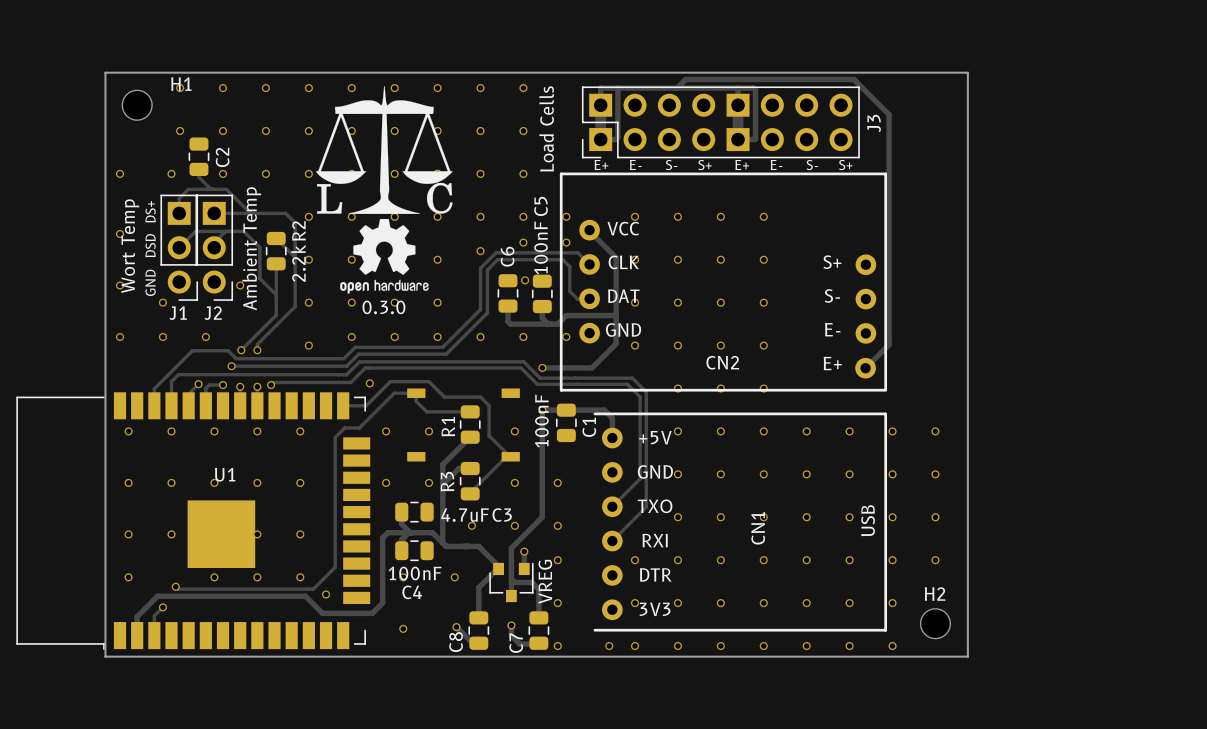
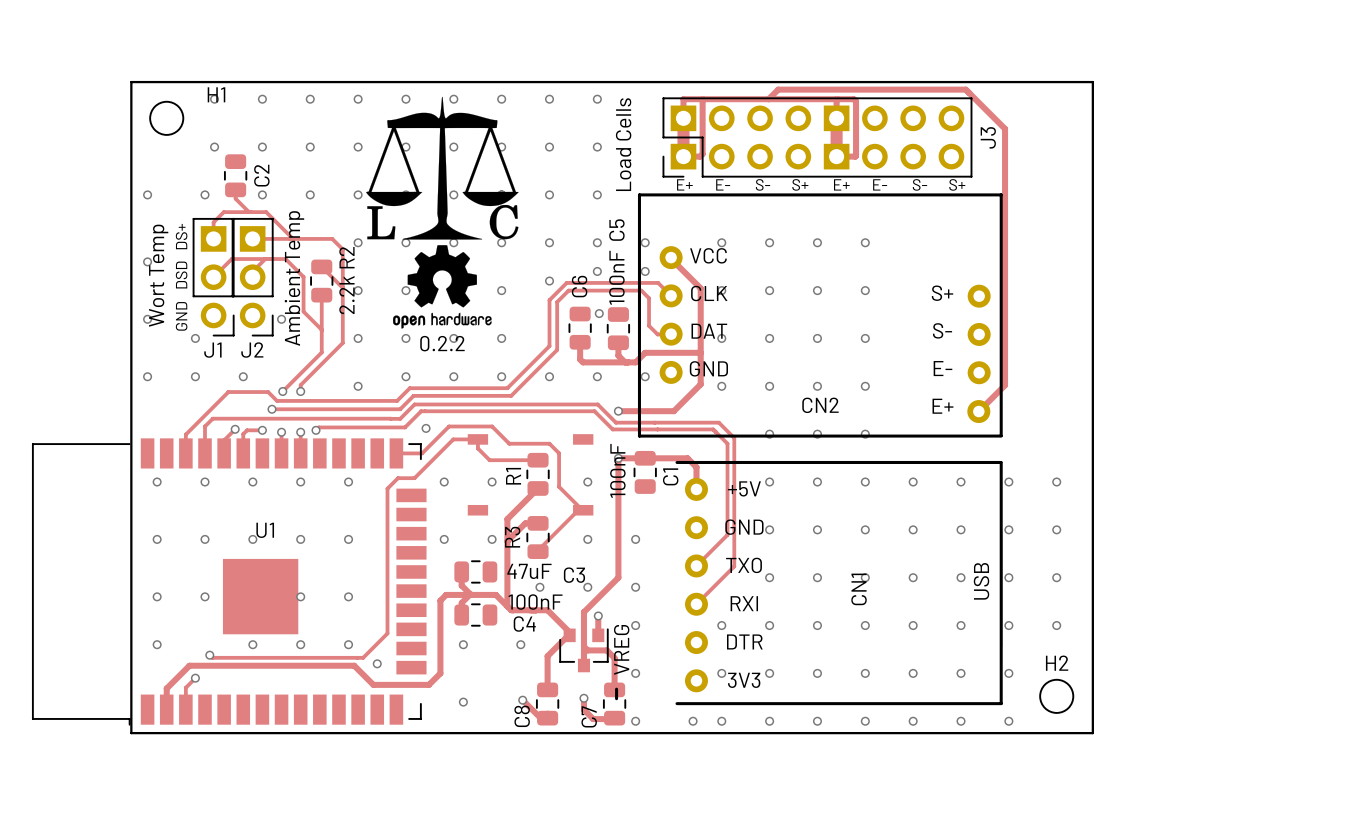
text: 0.3.0 (383, 307) -> 0.2.2 (442, 343)
C3 value: 4.7uF (465, 515) -> 47uF (529, 571)
C4 value position: 100nF (415, 573) -> 100nF (535, 602)
C4 name position: C4 (412, 592) -> C4 (524, 624)
line: none -> (616, 689) (616, 698)

